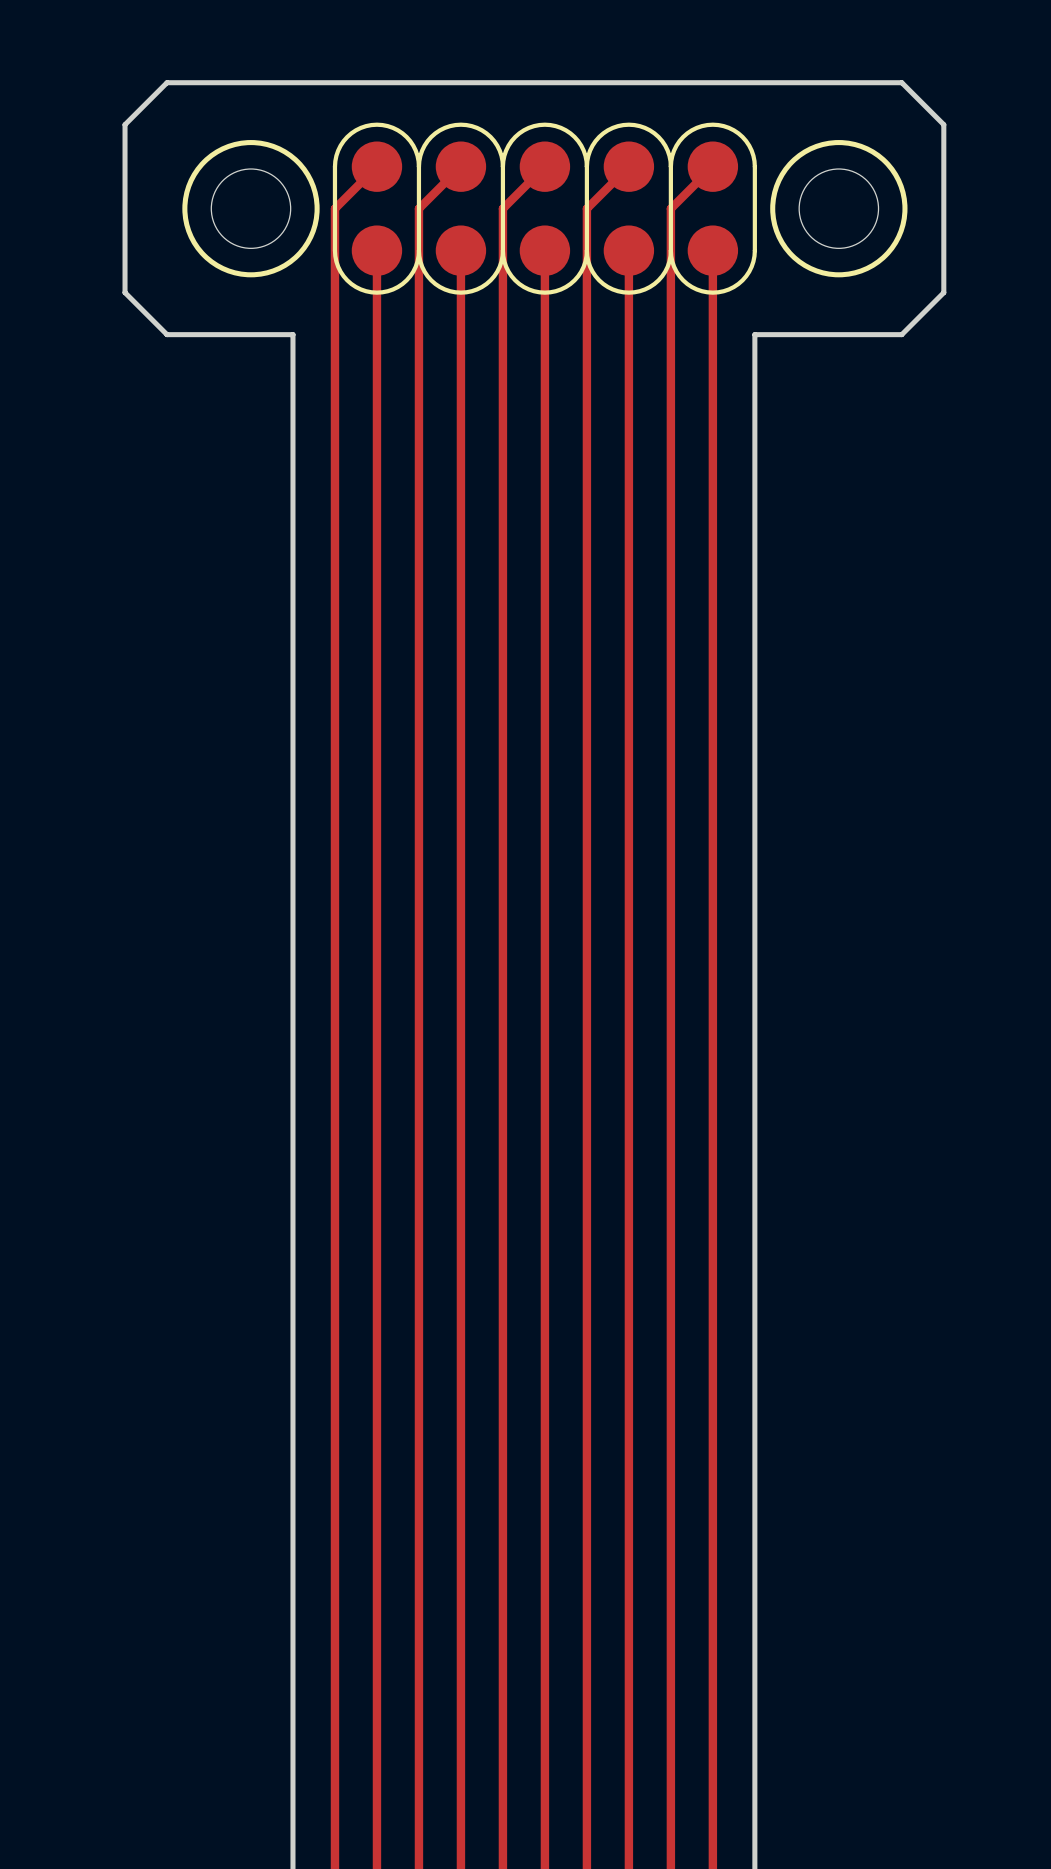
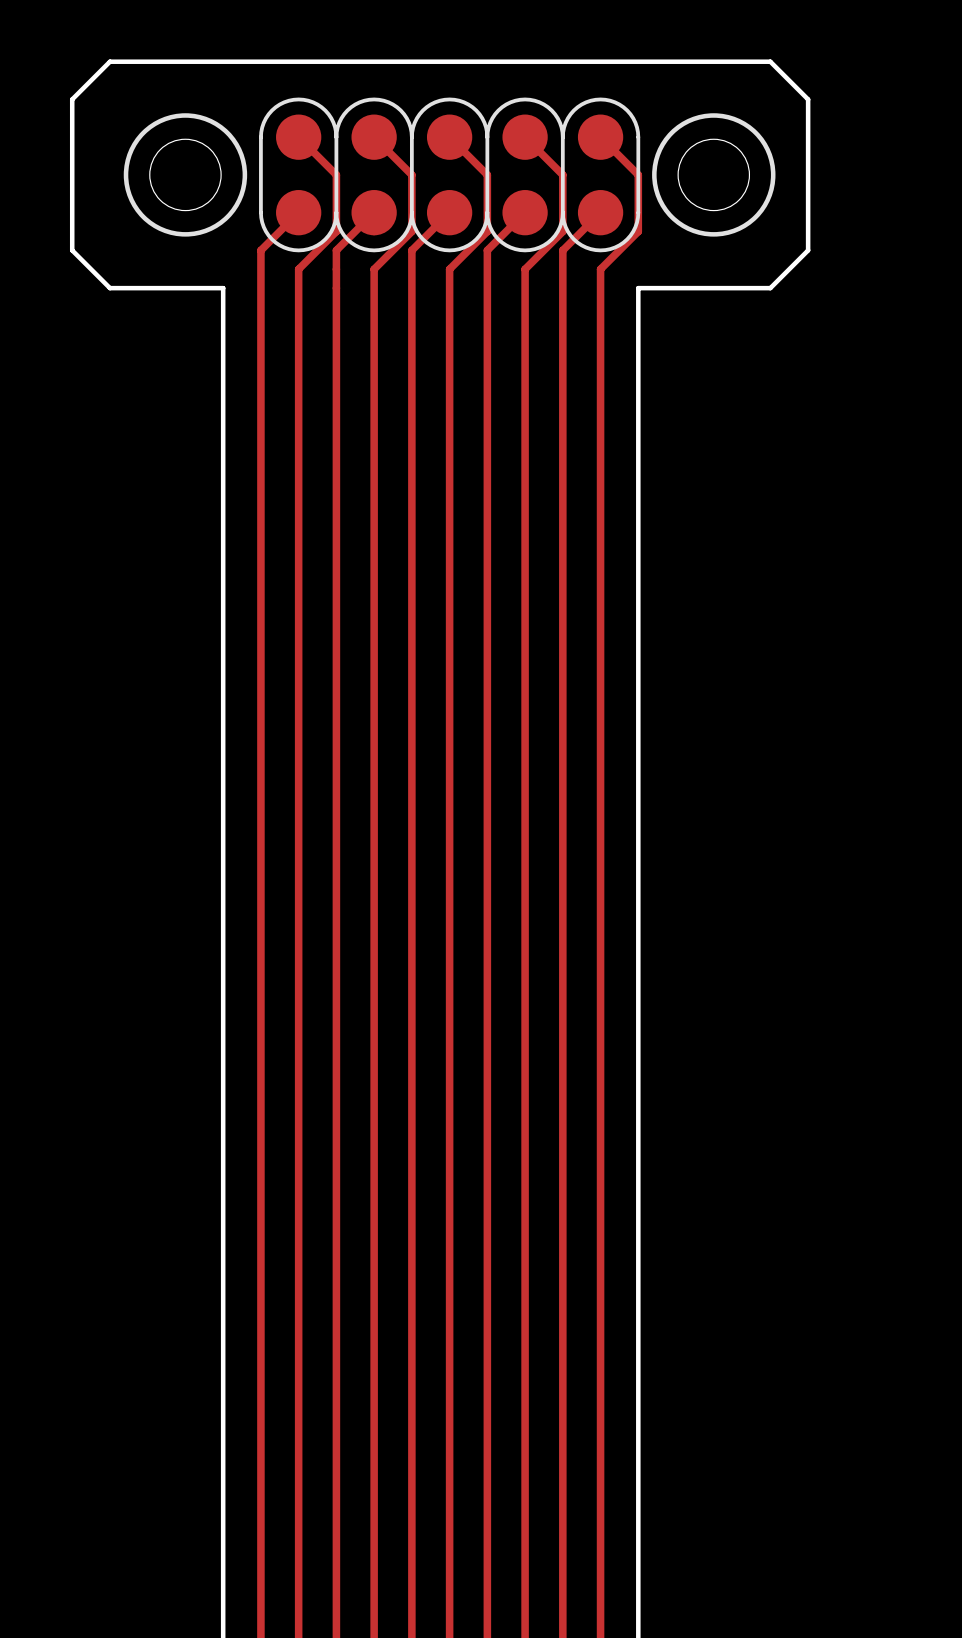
top track: (376, 166) (334, 208) (334, 292) -> none
top track: (460, 166) (418, 208) -> (298, 137) (336, 174)
top track: none -> (374, 137) (411, 174)
top track: (544, 166) (502, 208) -> (449, 137) (487, 174)
top track: (628, 166) (586, 208) -> (525, 137) (562, 174)
top track: (712, 166) (670, 208) -> (600, 137) (638, 174) (638, 231) (600, 269)
top track: (376, 250) (376, 313) -> (298, 212) (260, 250)
top track: none -> (374, 212) (336, 250)
top track: (544, 250) (544, 313) -> (449, 212) (411, 250)
top track: (628, 250) (628, 313) -> (525, 212) (487, 250)
top track: (712, 250) (712, 313) -> (600, 212) (562, 250)
top track: (418, 271) (418, 292) -> (336, 231) (298, 269)
top track: (460, 271) (460, 313) -> (411, 231) (374, 269)
top track: (502, 271) (502, 292) -> none
top track: (586, 271) (586, 292) -> (487, 231) (449, 269)
top track: (670, 271) (670, 292) -> (562, 231) (525, 269)

